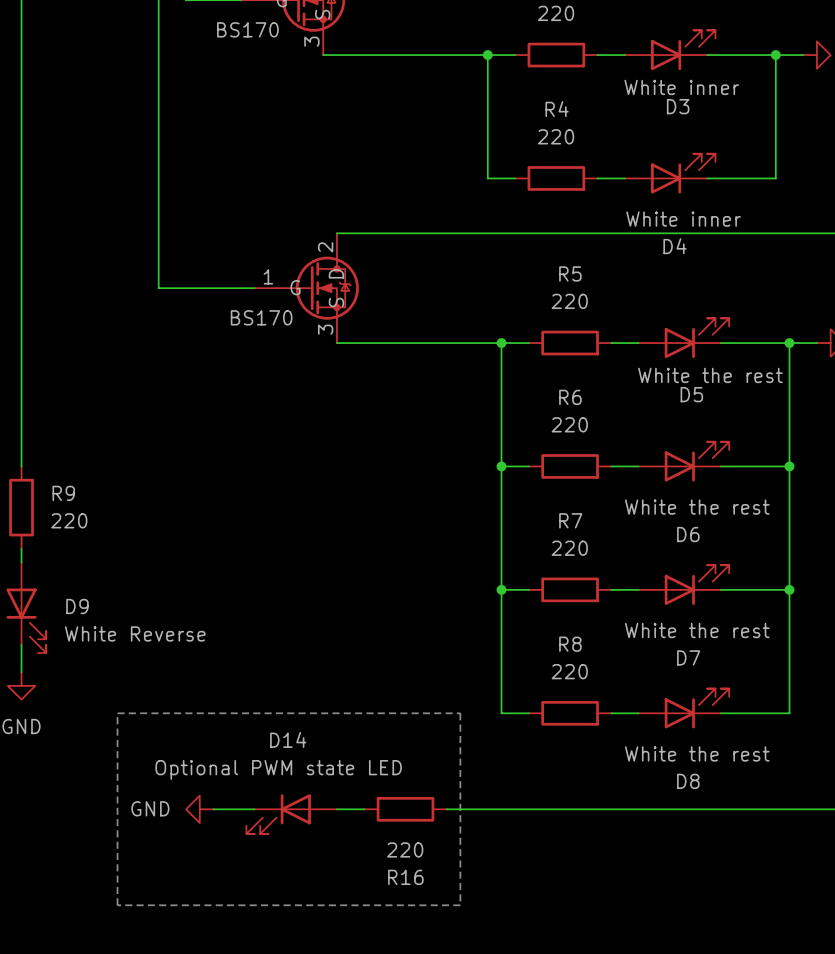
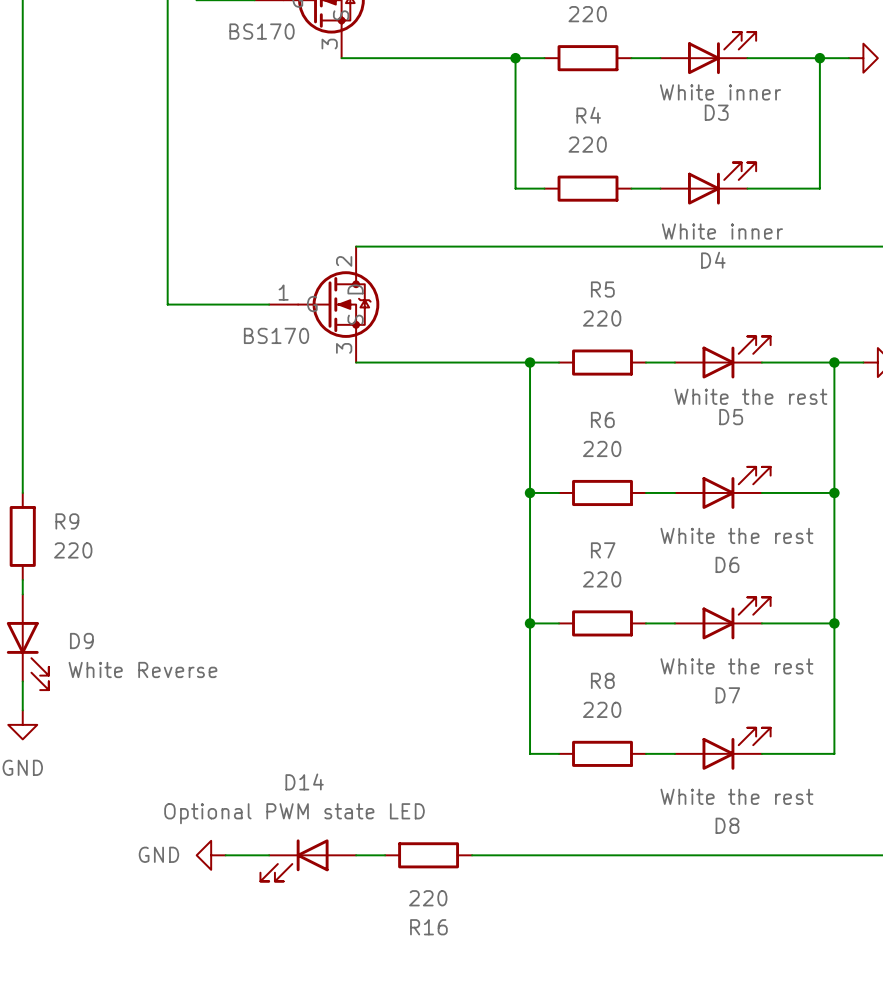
line: (117, 713) (460, 713) (460, 905) (117, 905) (117, 713) -> none

